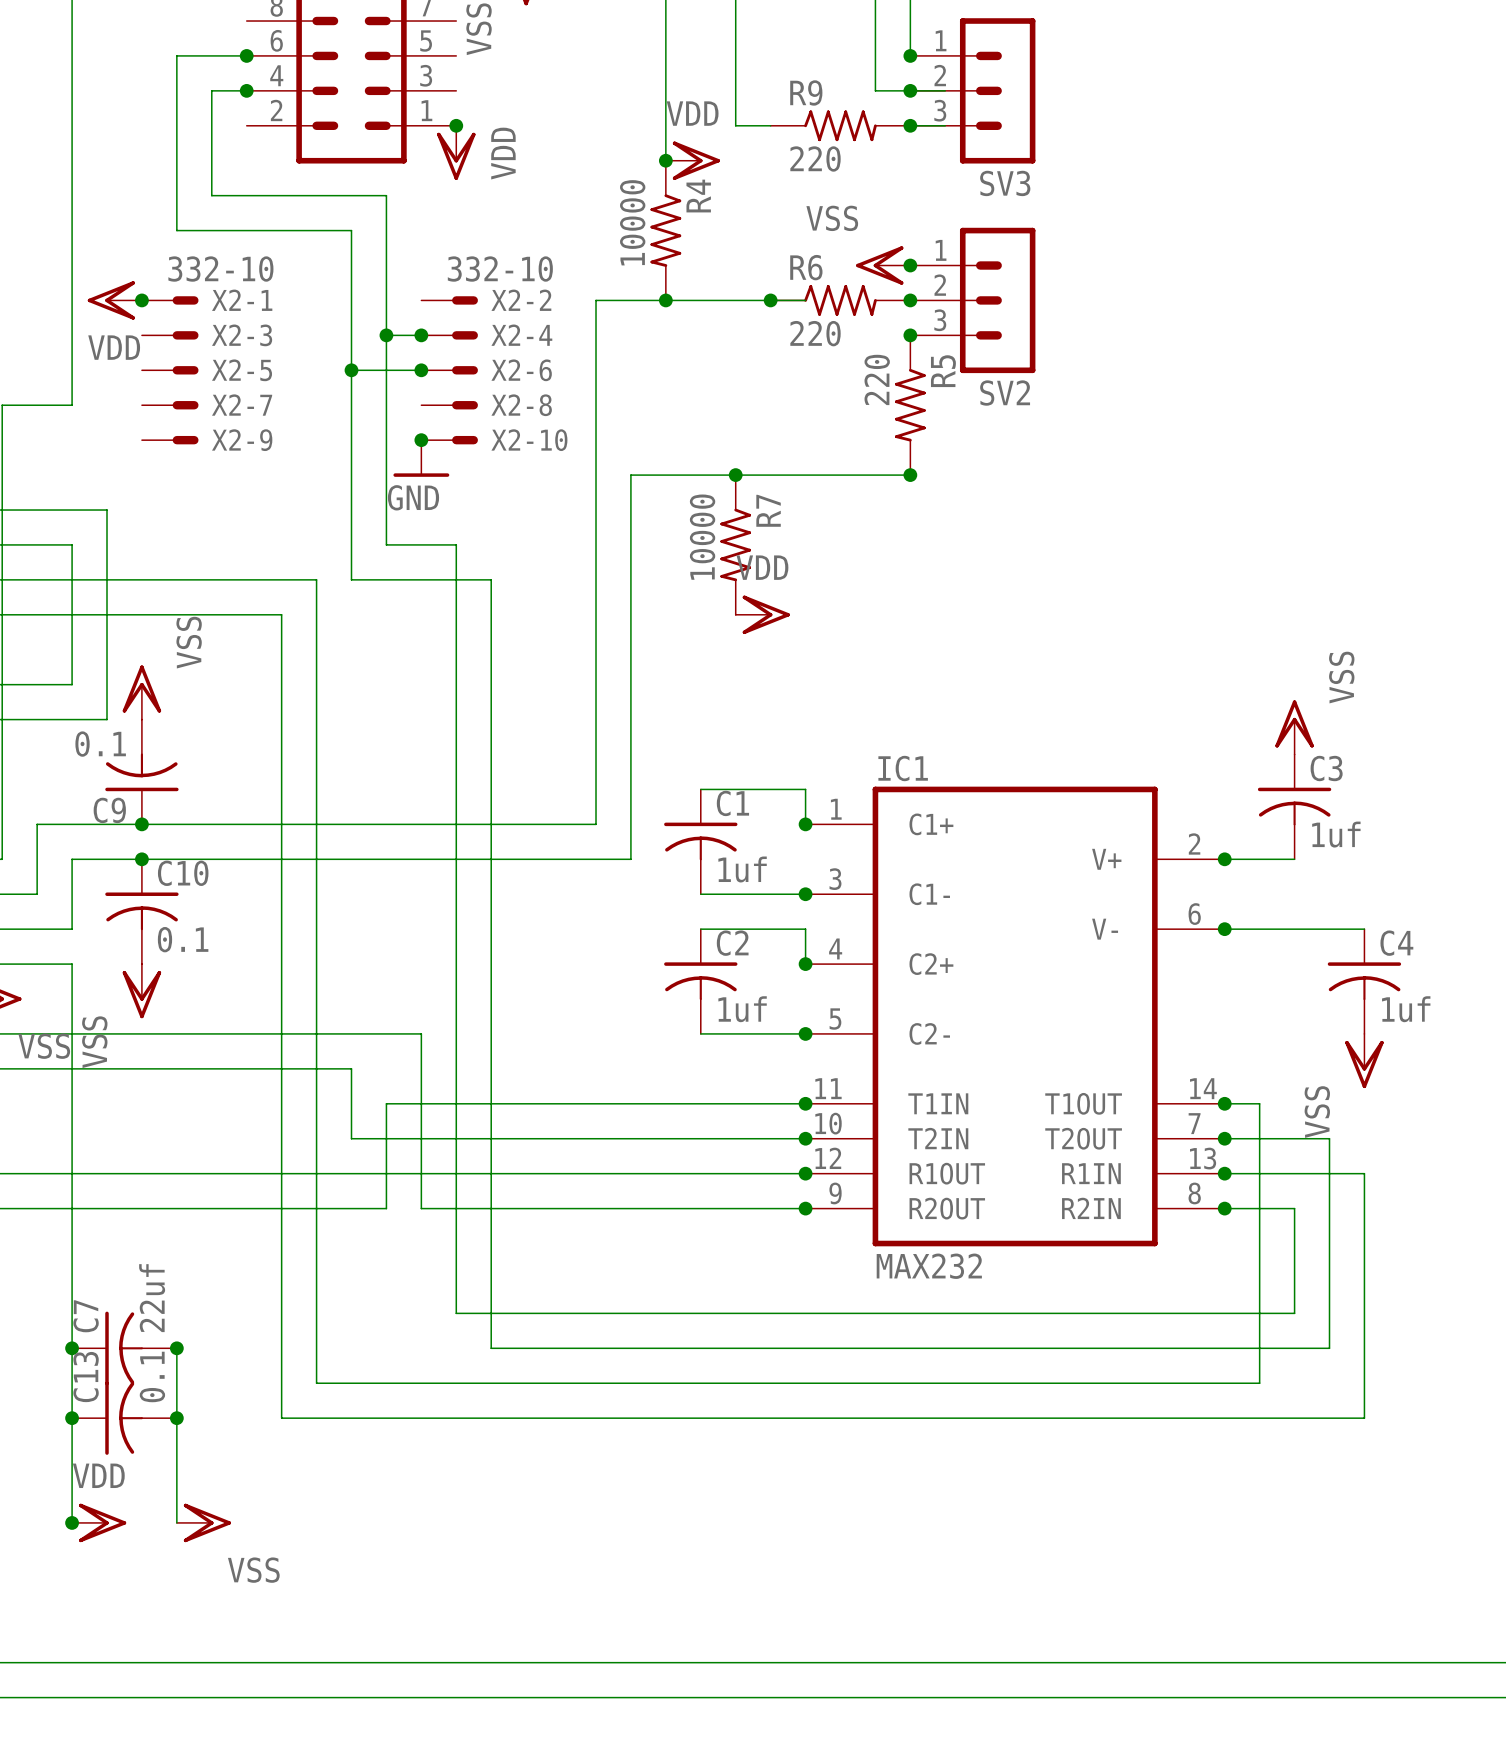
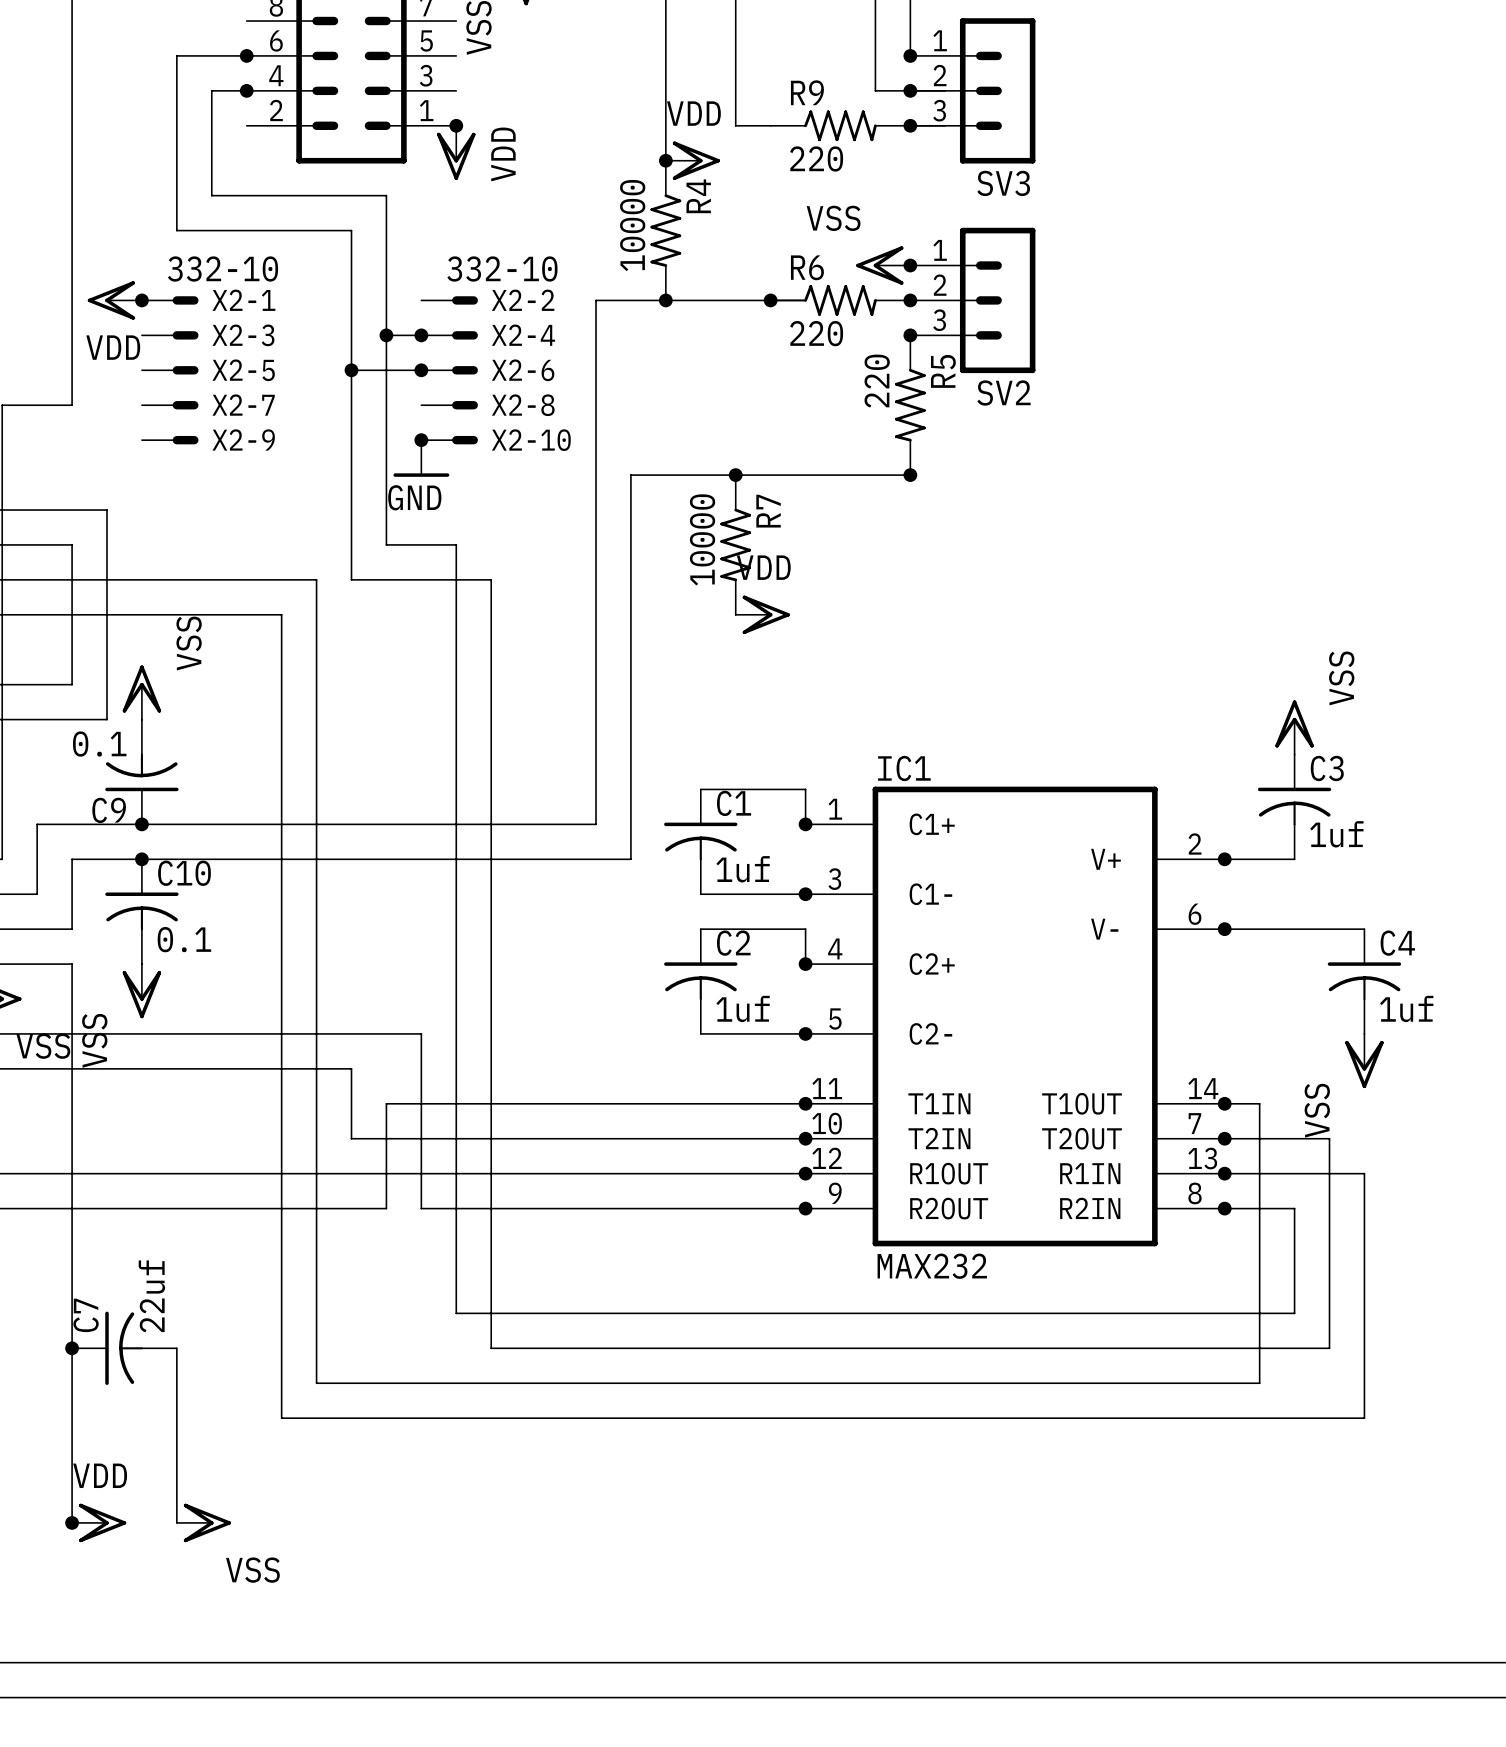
junction: (176, 1348) -> none
junction: (72, 1418) -> none
C13: 0.1 (124, 1418) -> none
junction: (176, 1418) -> none

